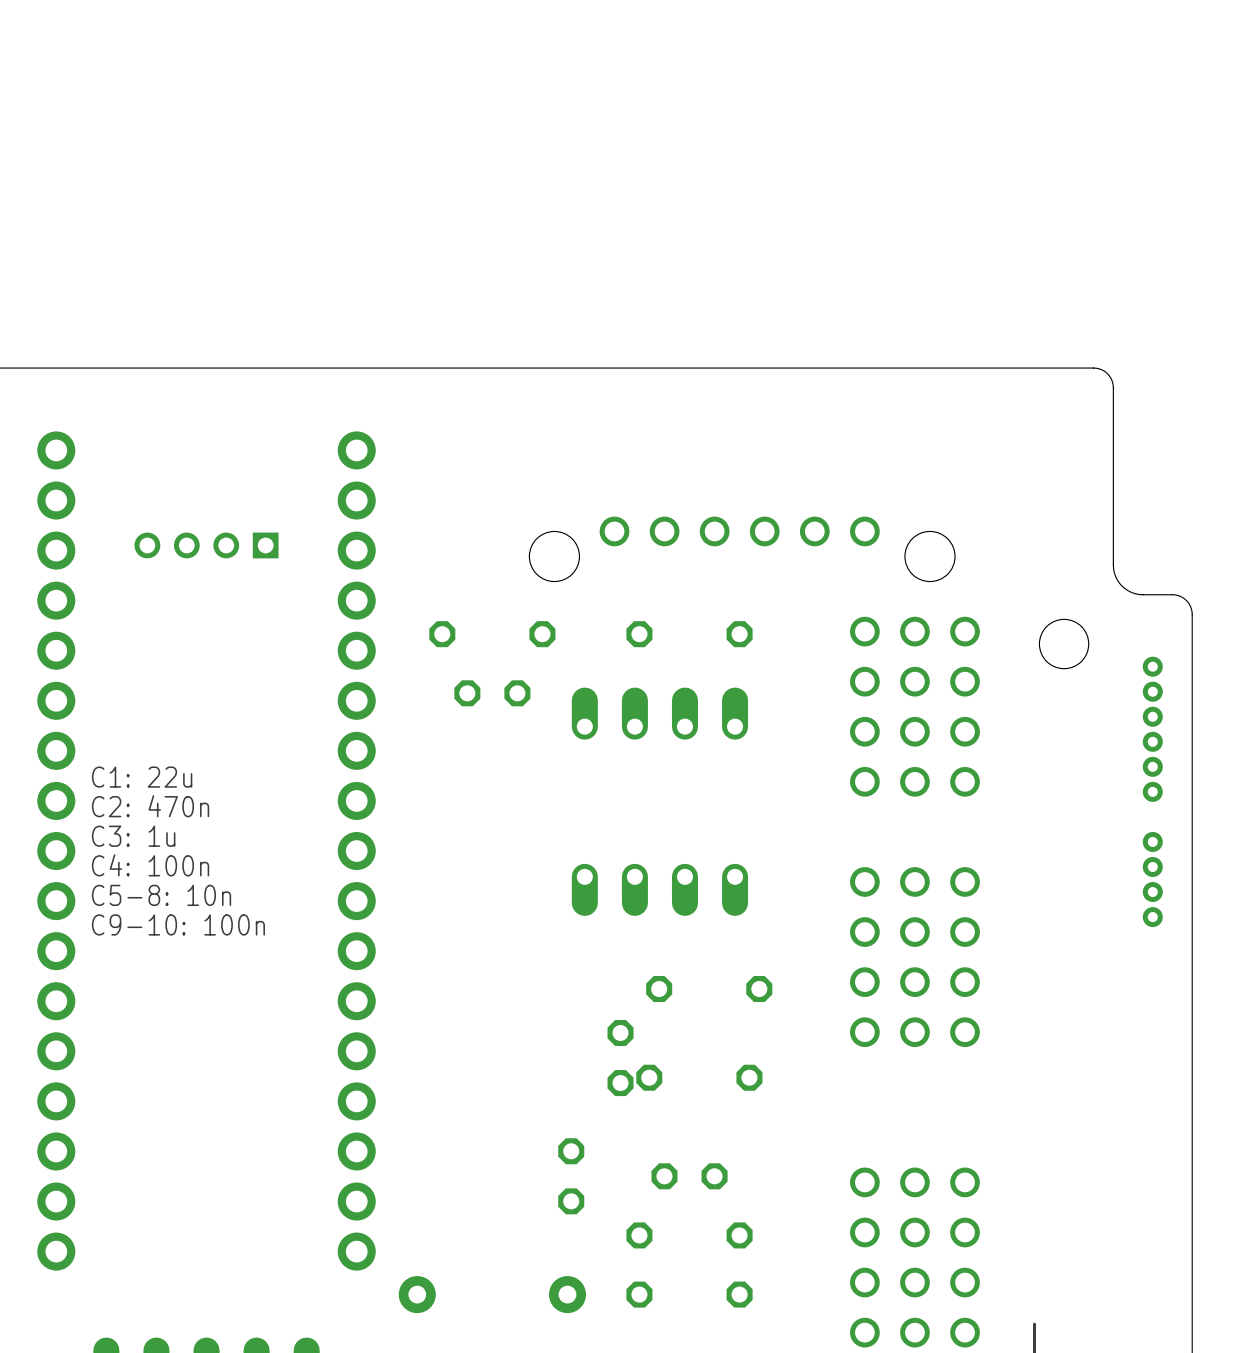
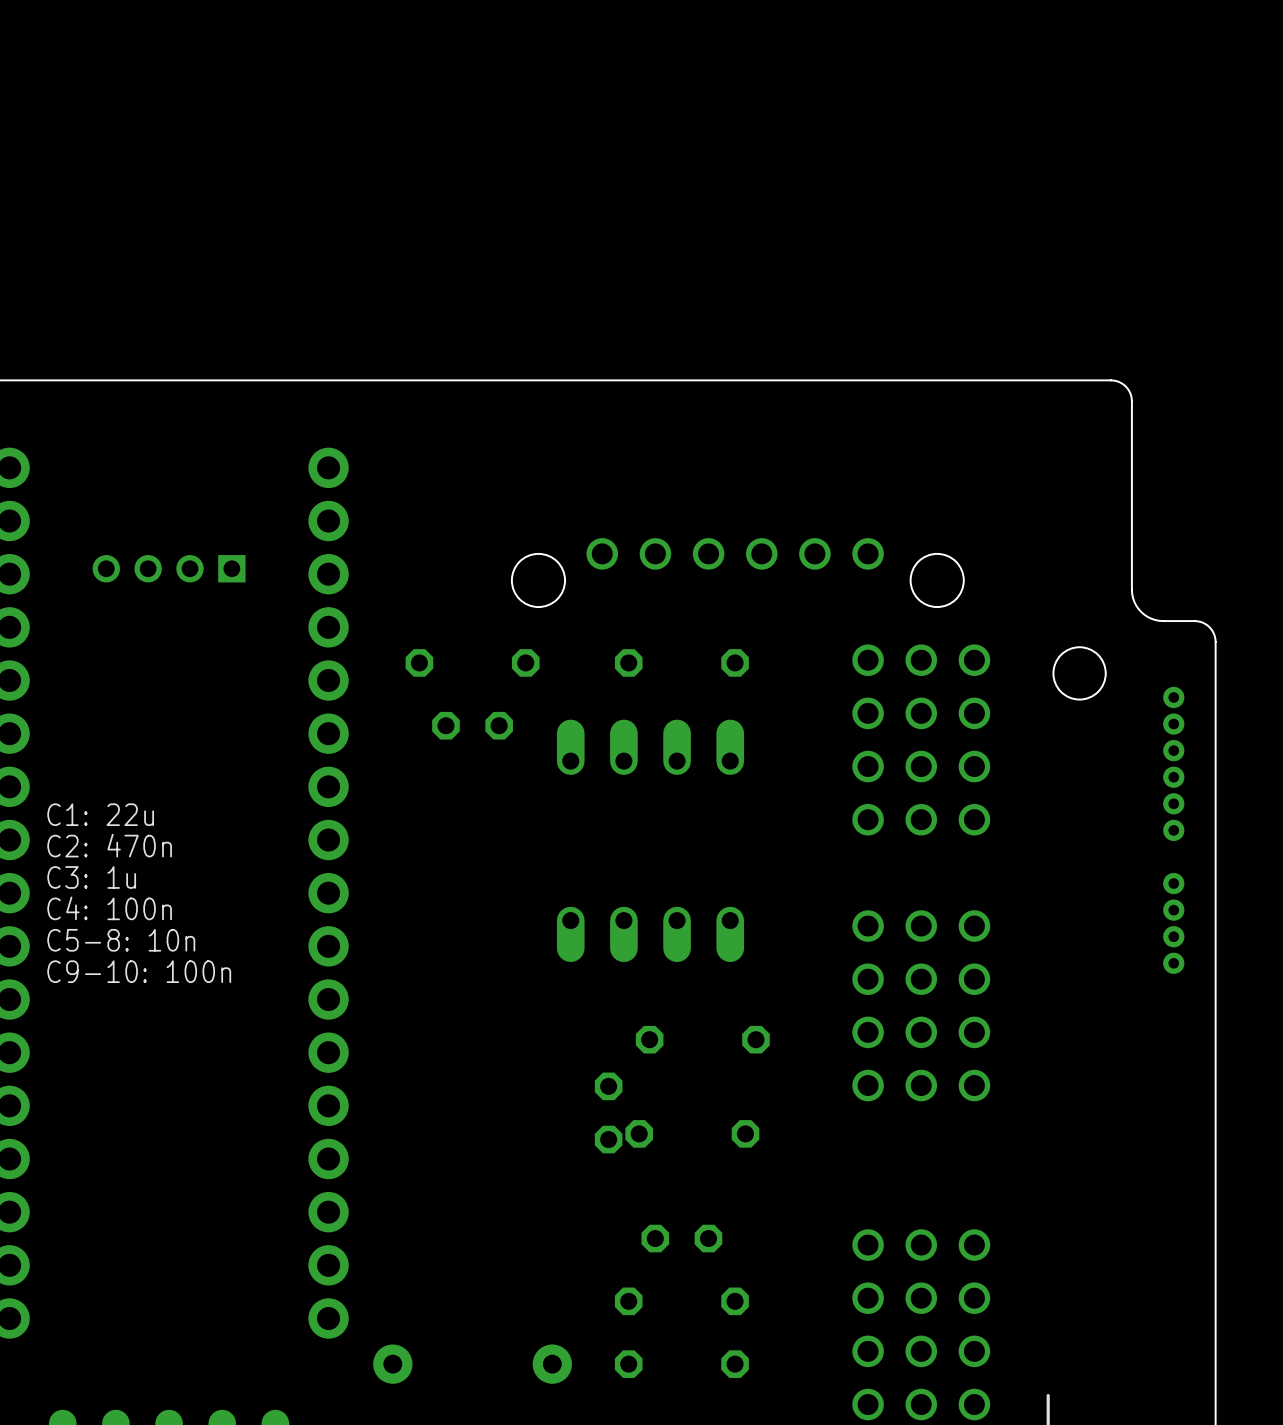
part: (571, 1176) -> none

